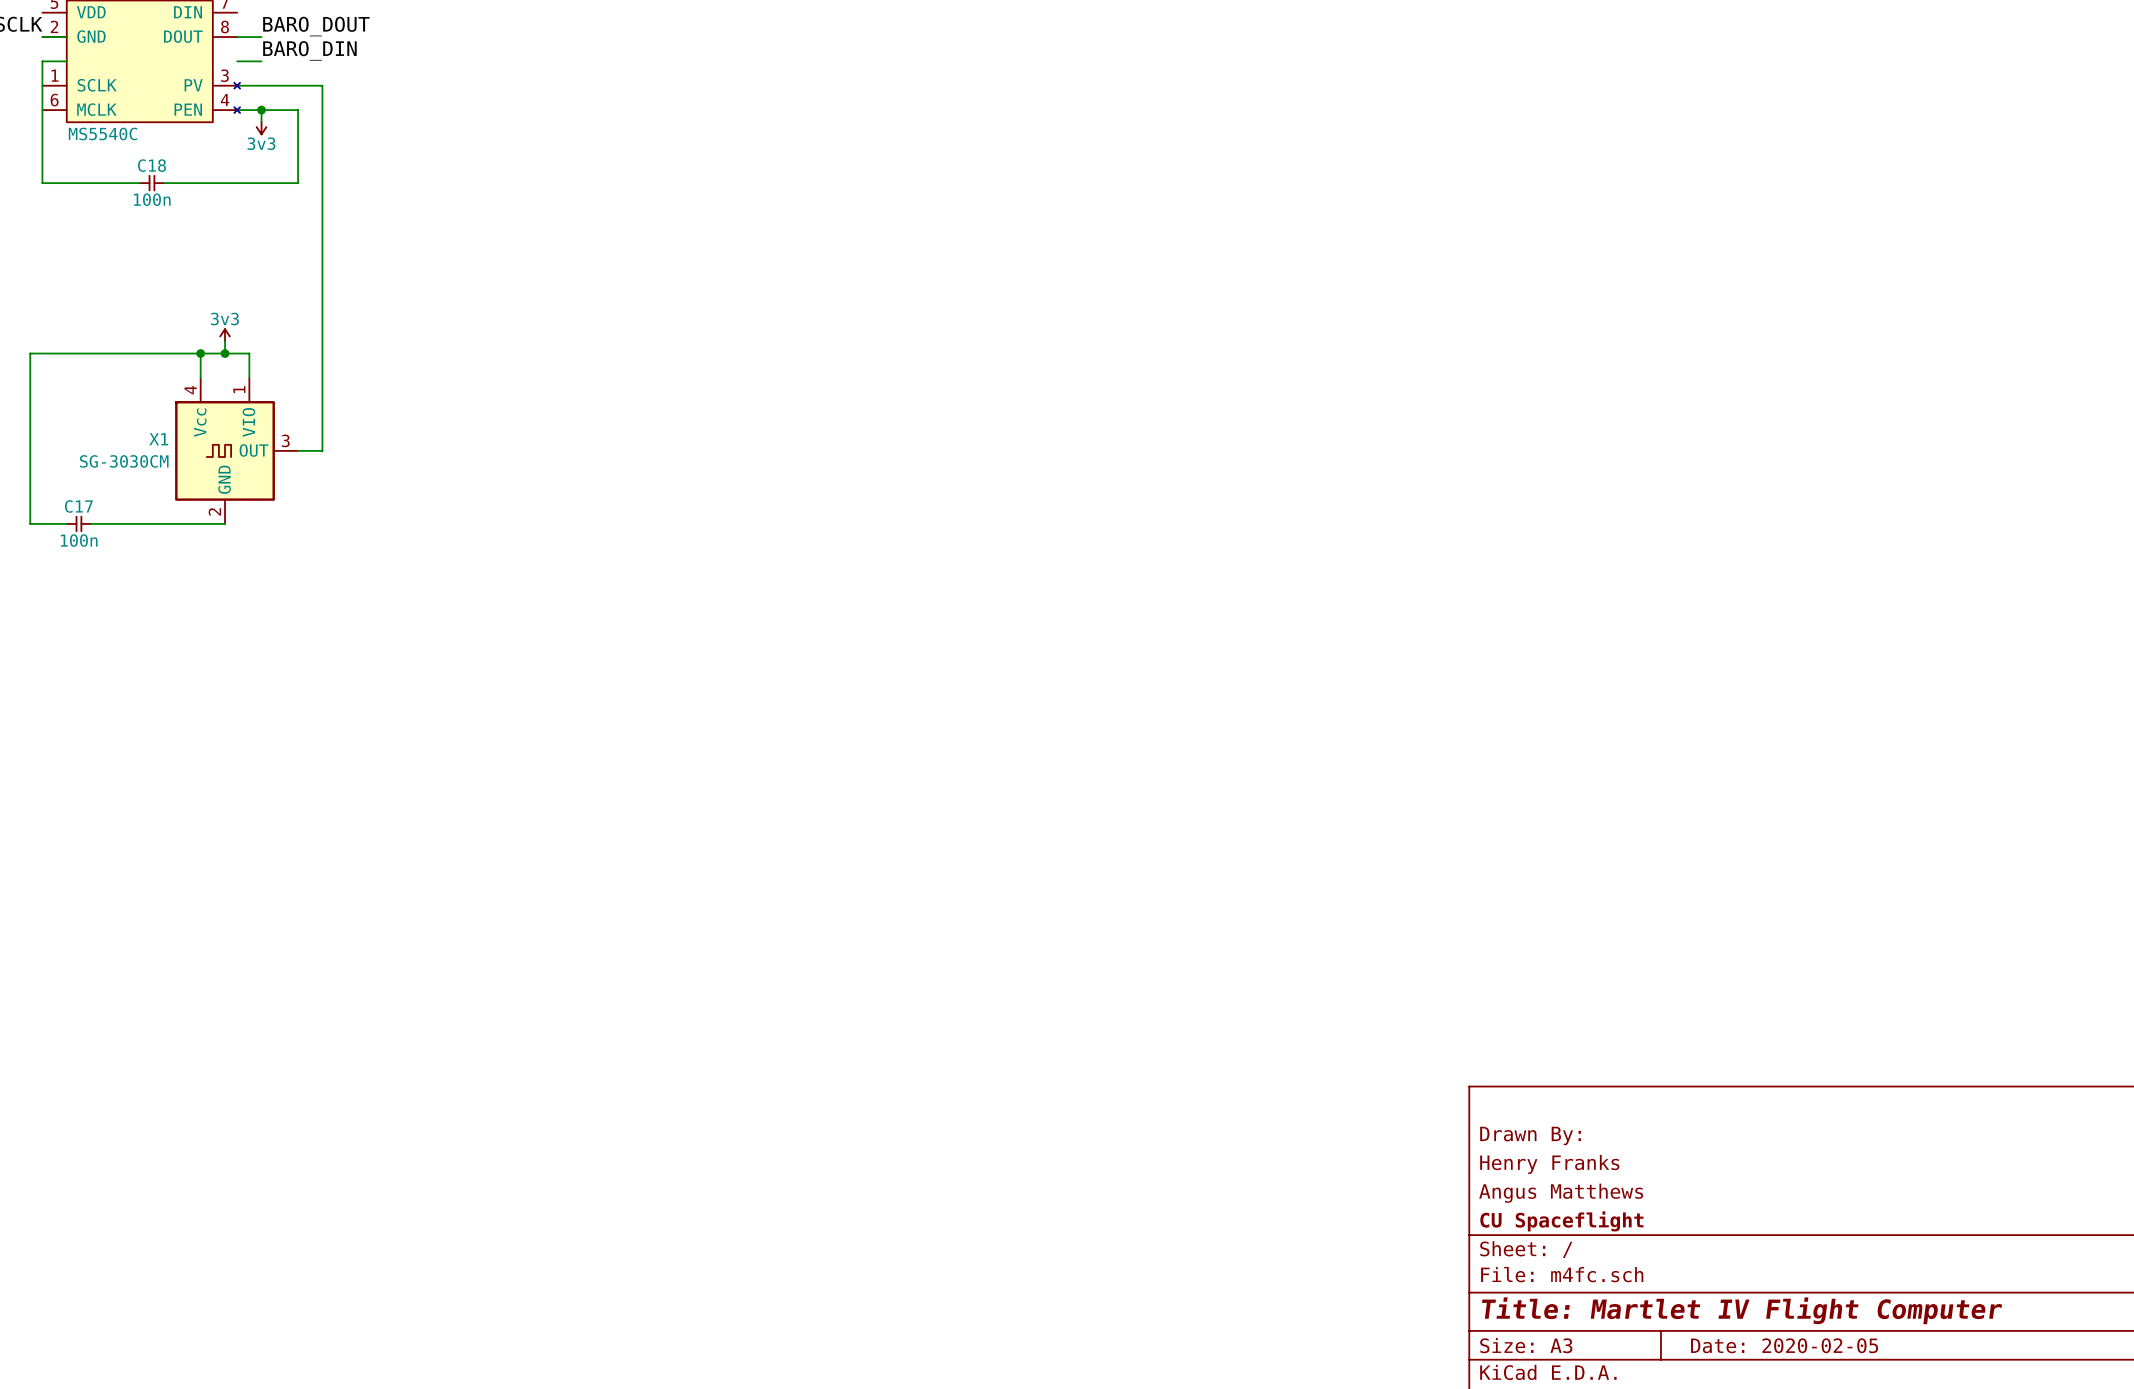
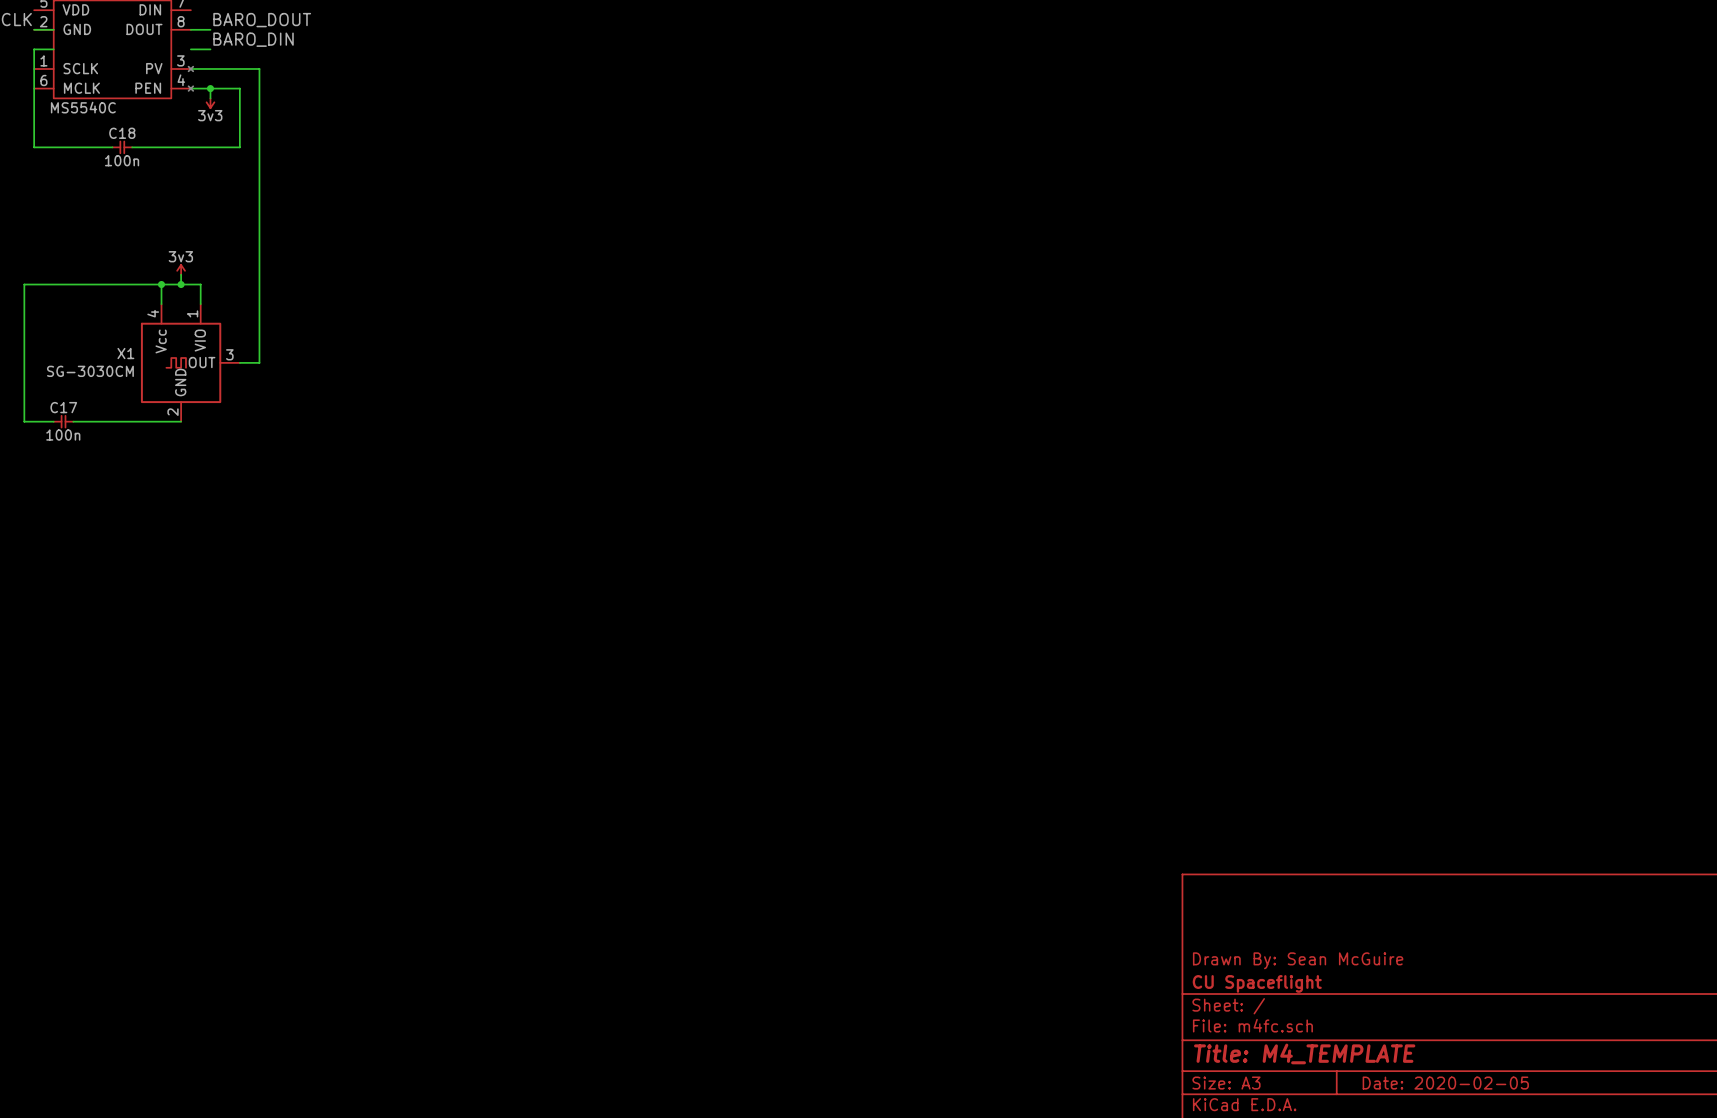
title block: Drawn By: (1530, 1135) -> none
title block: Henry Franks (1549, 1164) -> none
title block: Angus Matthews (1561, 1193) -> Drawn By: Sean McGuire (1298, 960)
title block: Title: Martlet IV Flight Computer (1741, 1310) -> Title: M4_TEMPLATE (1304, 1053)

